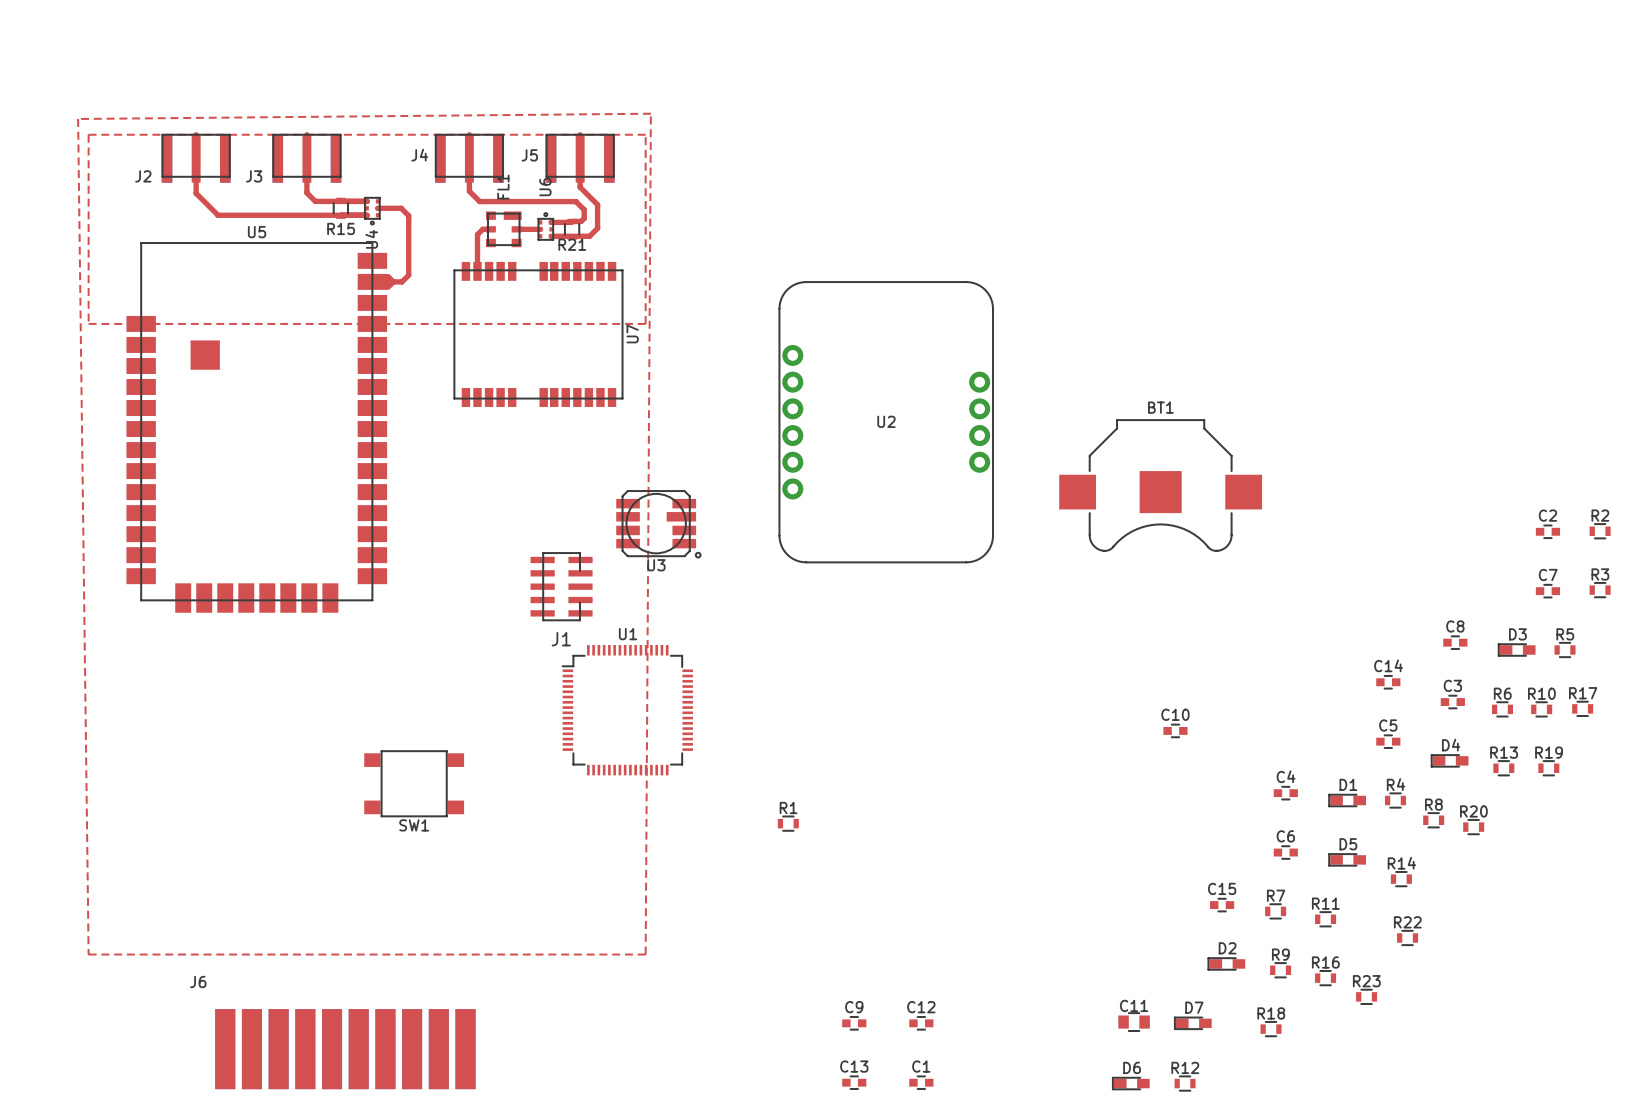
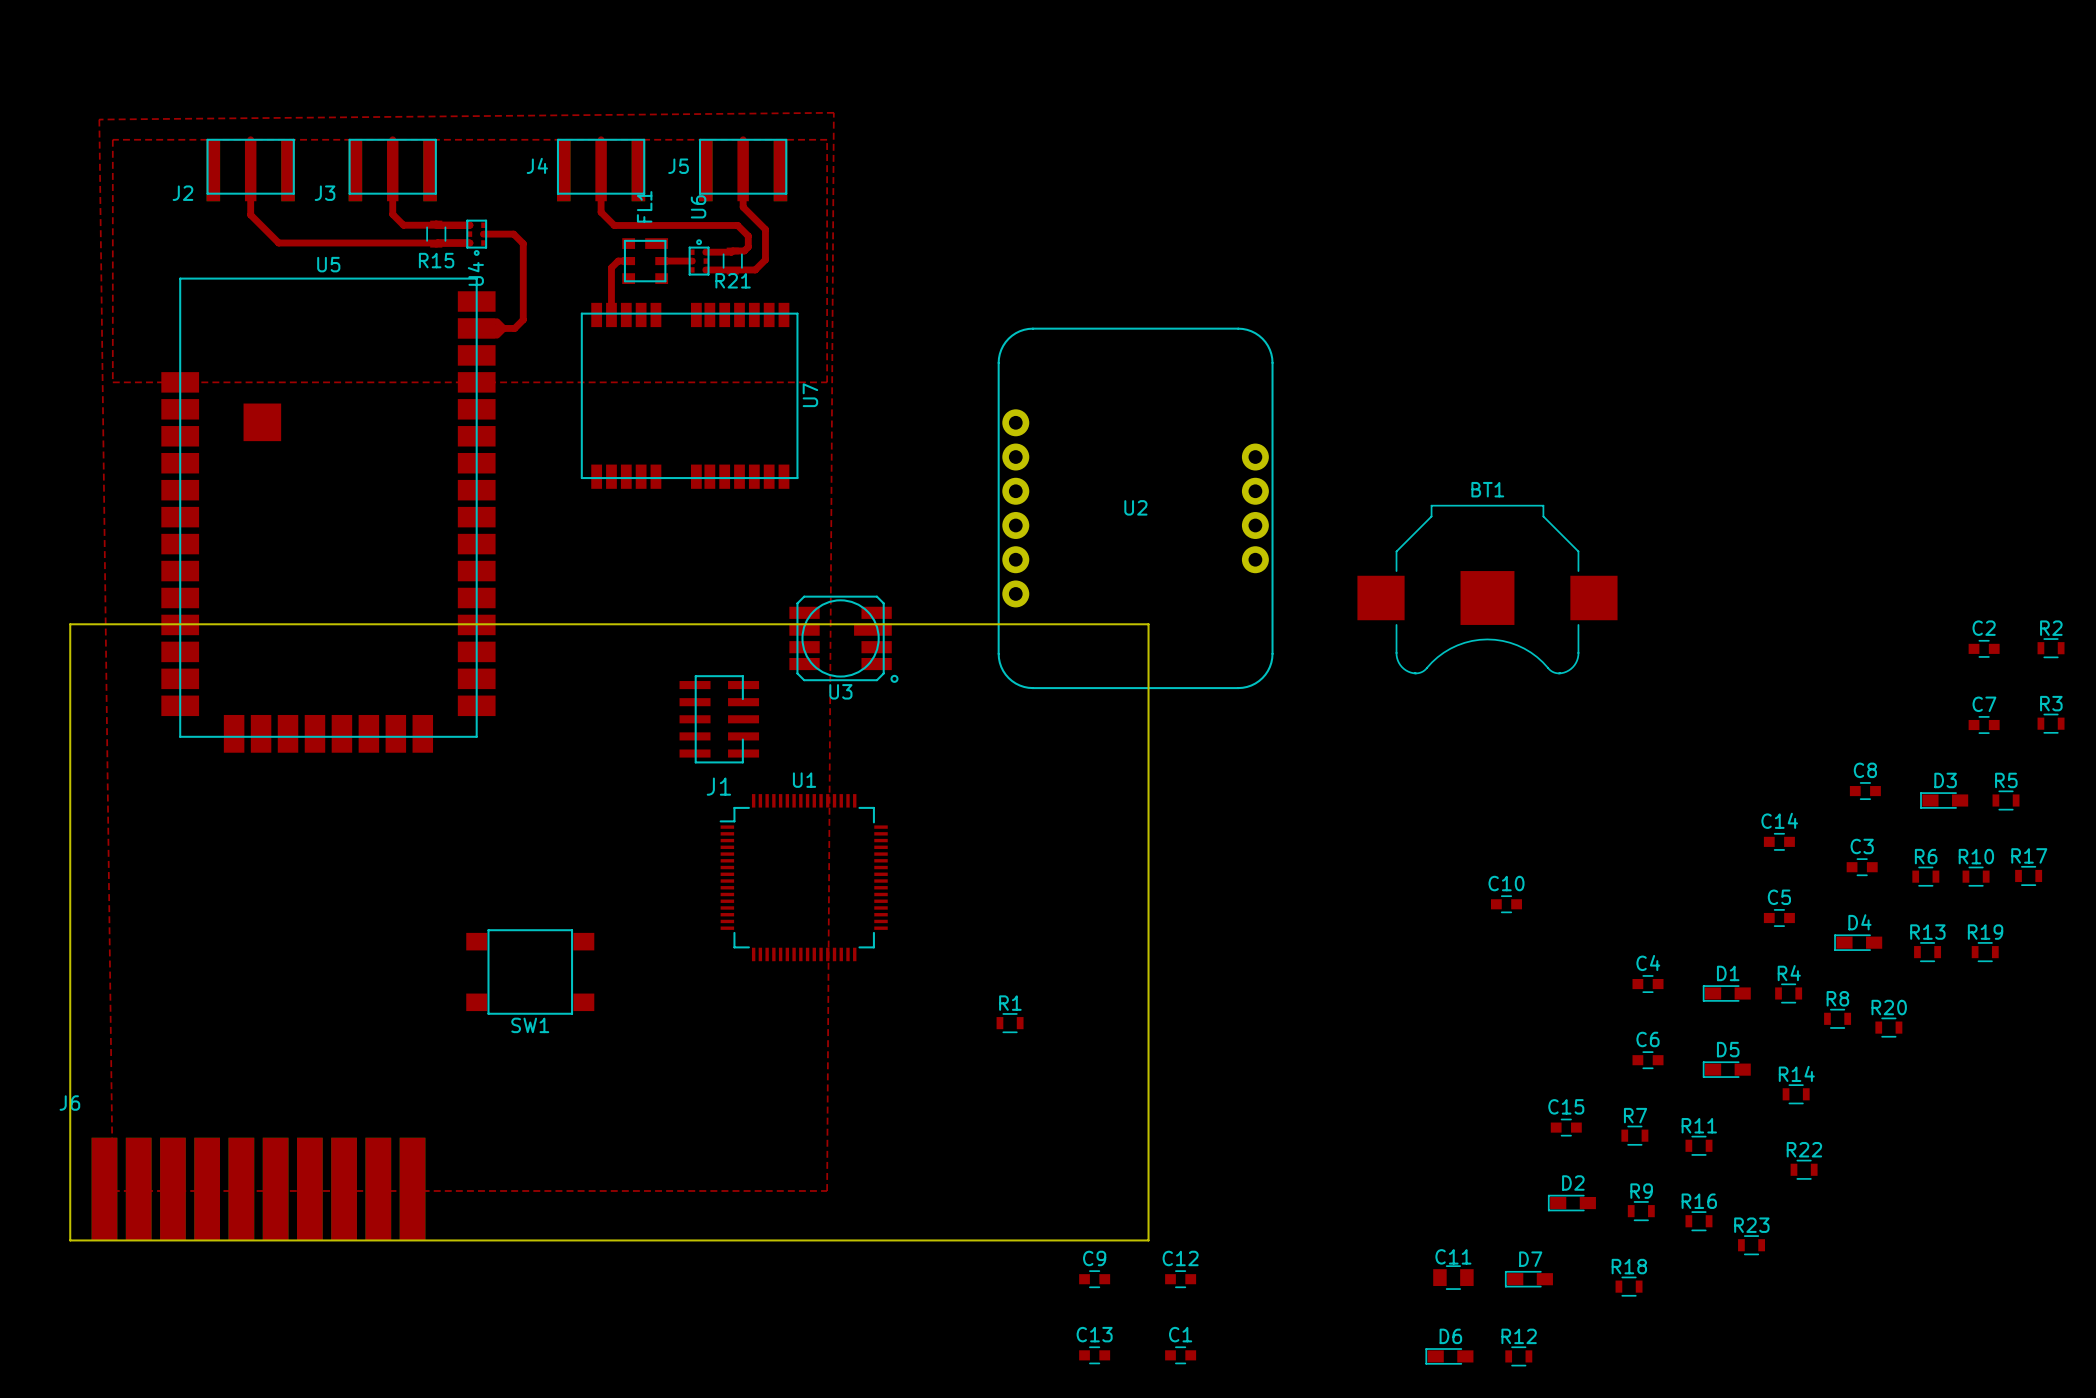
board edge: none -> (70, 624) (1148, 624) (1148, 1240) (70, 1240) (70, 624)
J6 position: (345, 1049) -> (258, 1189)

